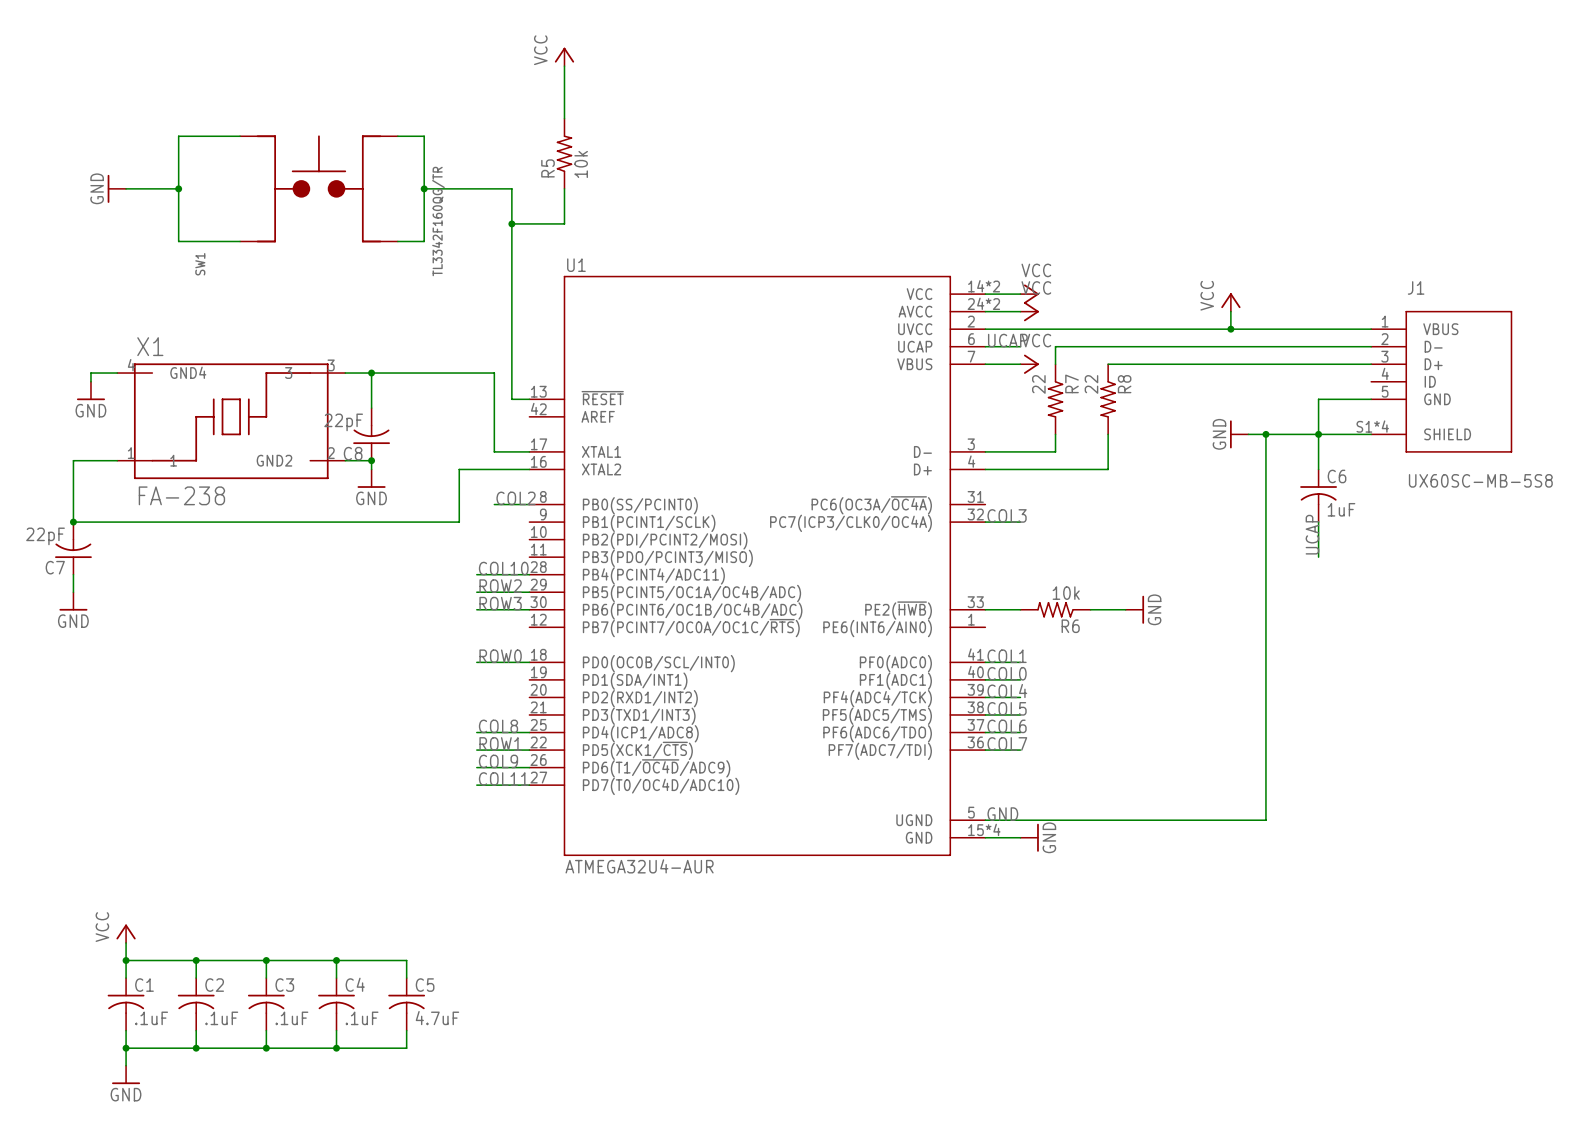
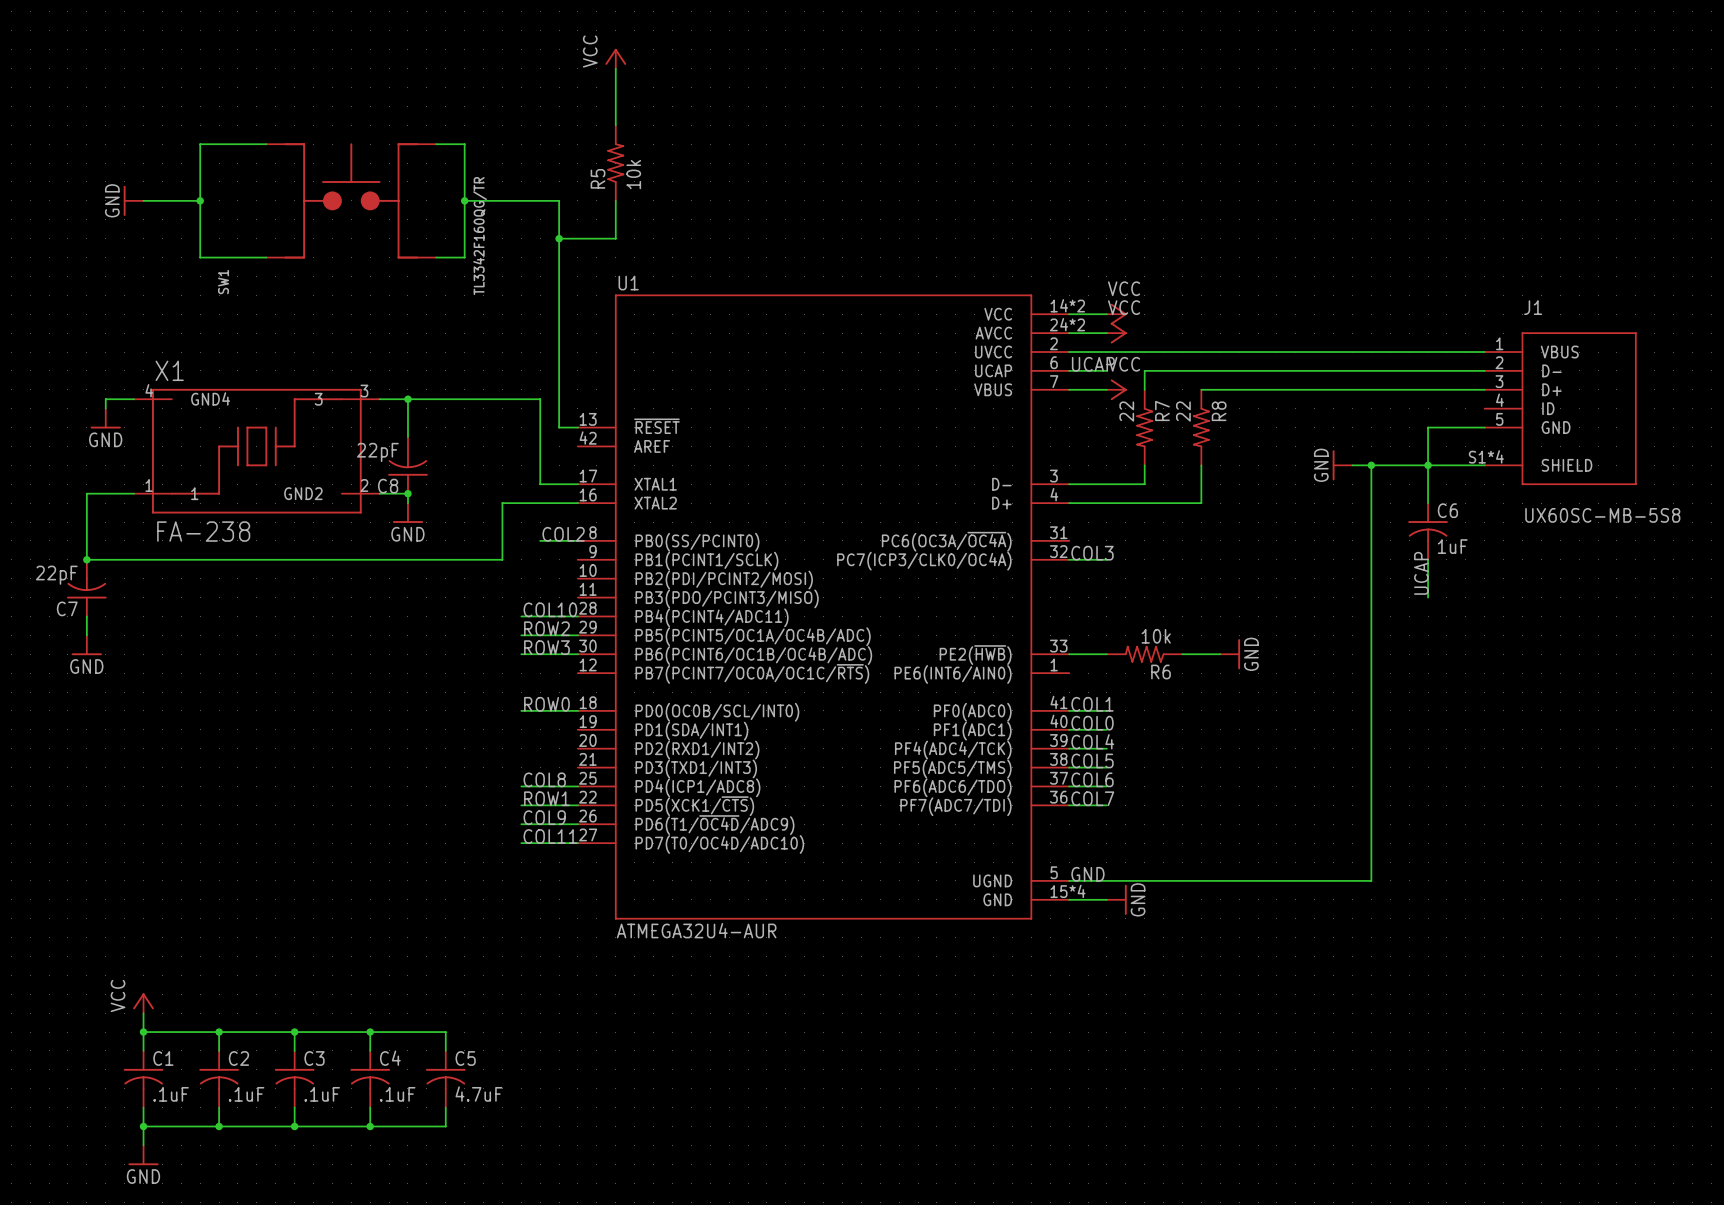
power symbol: VCC (1230, 302) -> none
wire: (1230, 311) (1230, 329) -> none
junction: (1230, 329) -> none

